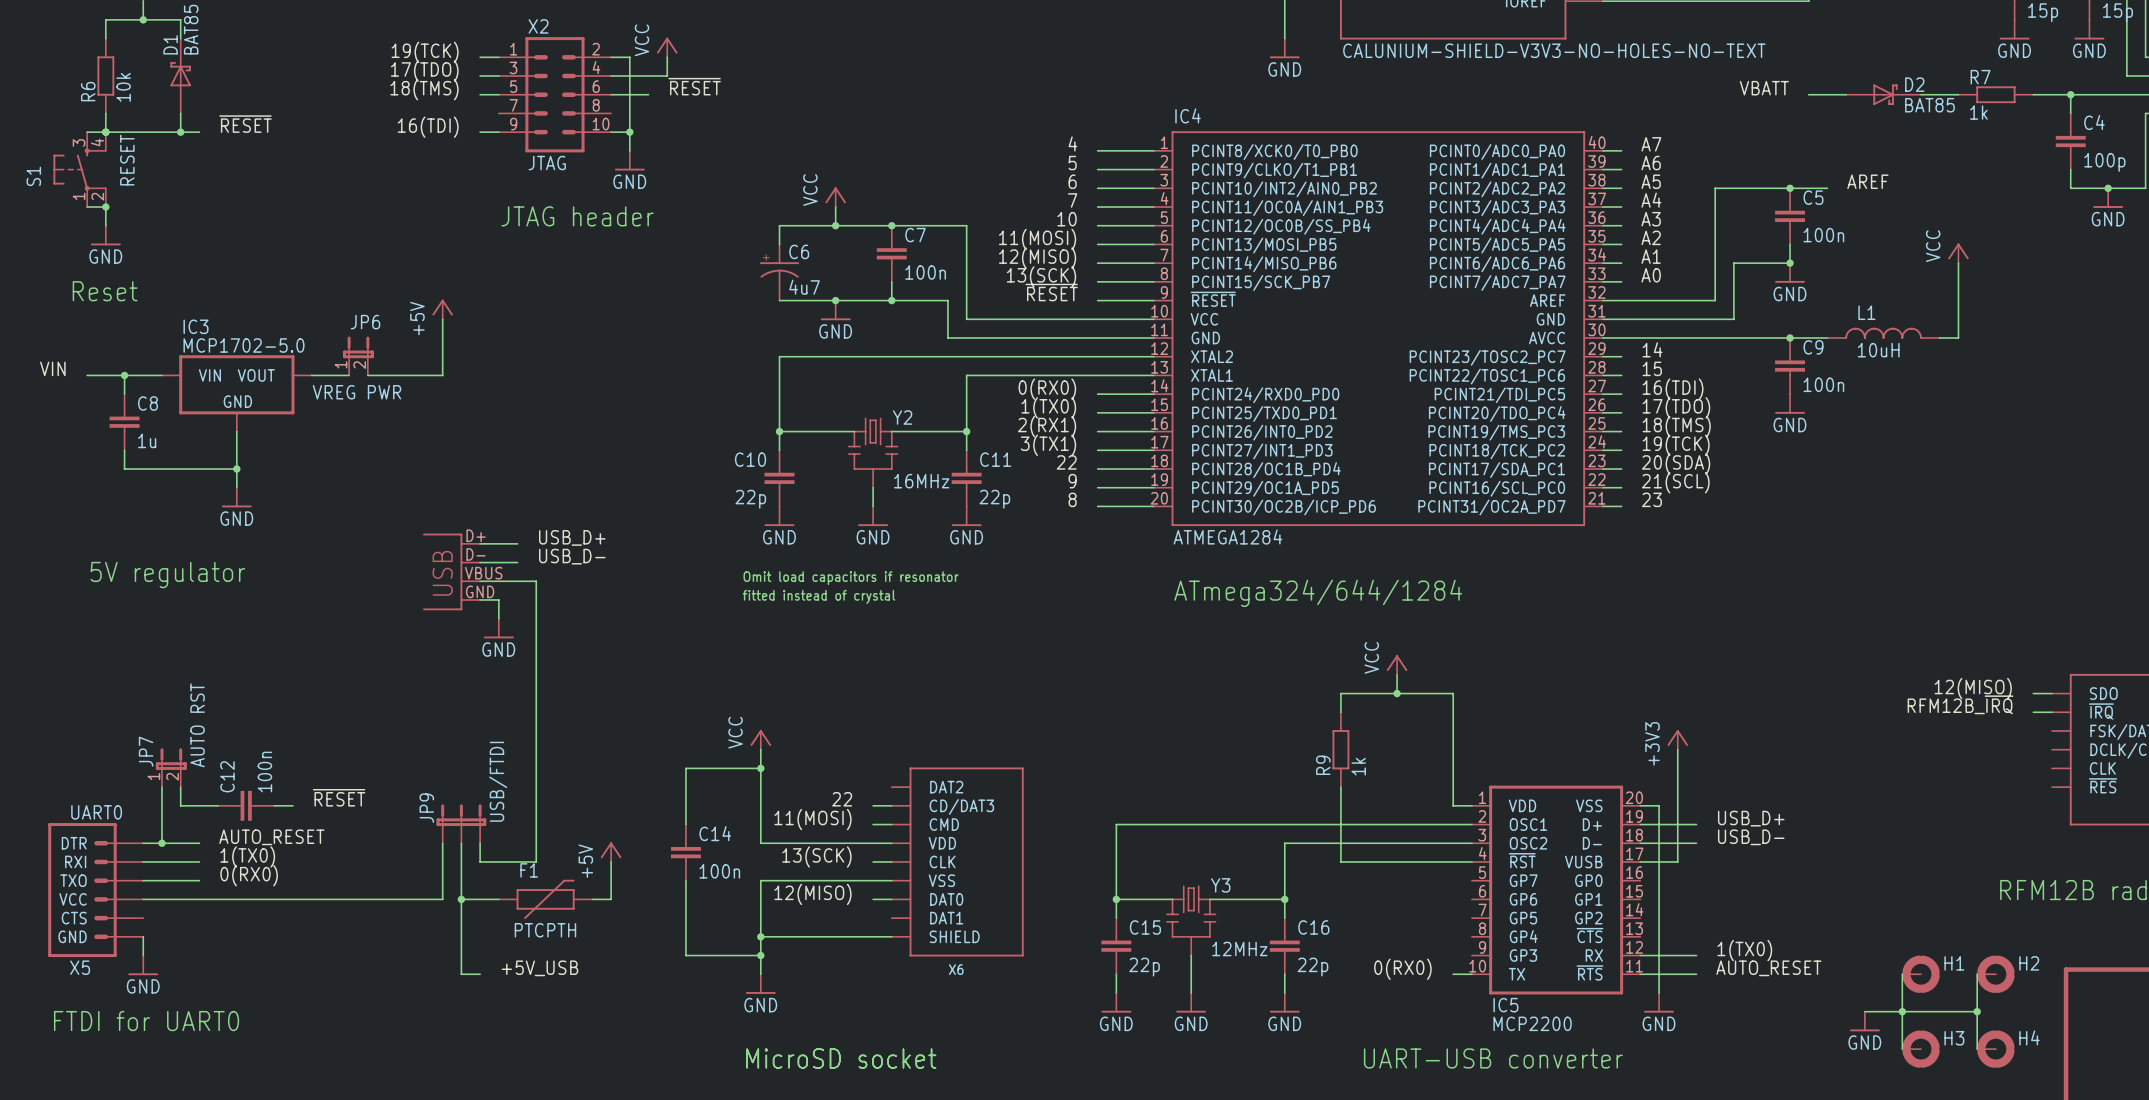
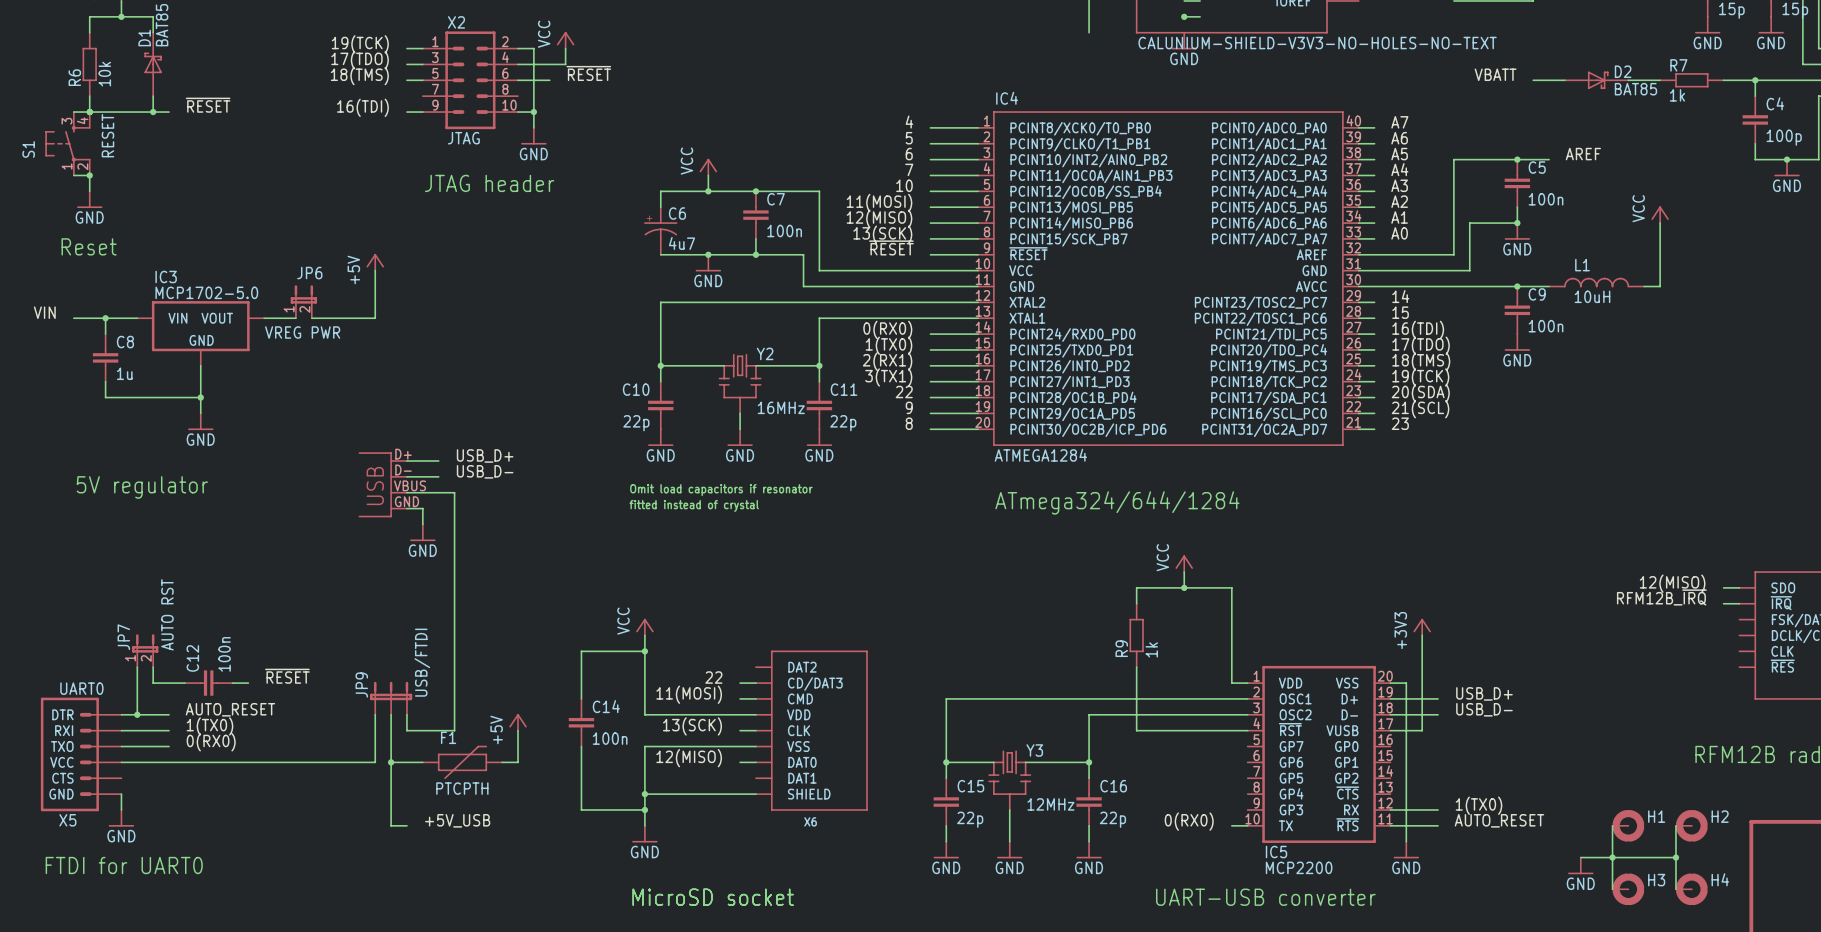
wire: none -> (1184, 0) (1200, 0)
wire: (1602, 1) (1715, 1) -> none
wire: none -> (1184, 16) (1200, 16)
junction: none -> (1184, 16)
power symbol position: GND (1284, 48) -> GND (1184, 41)

